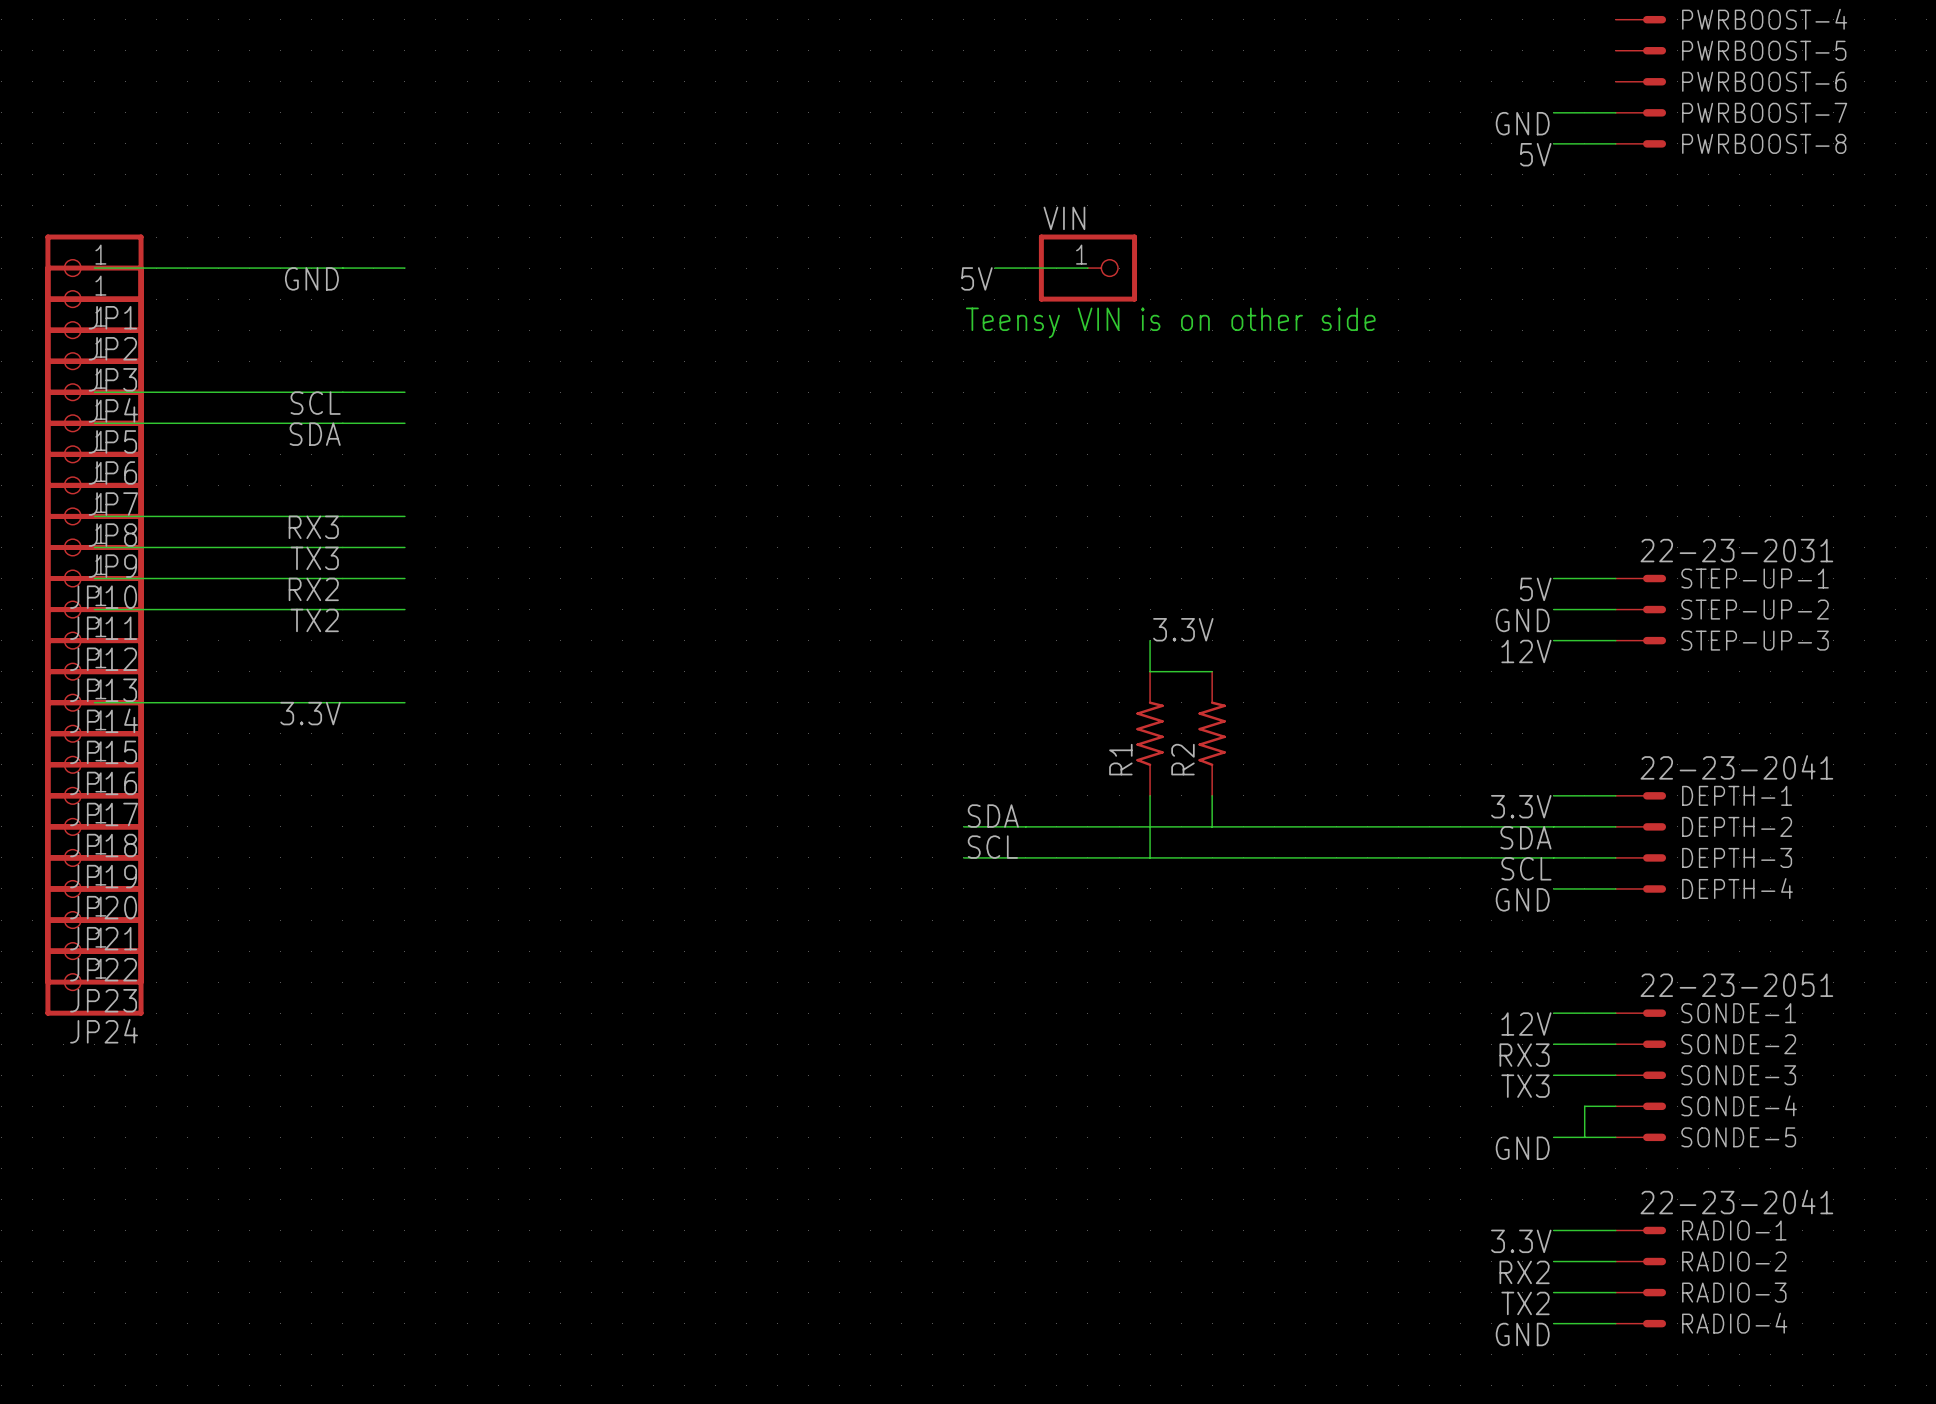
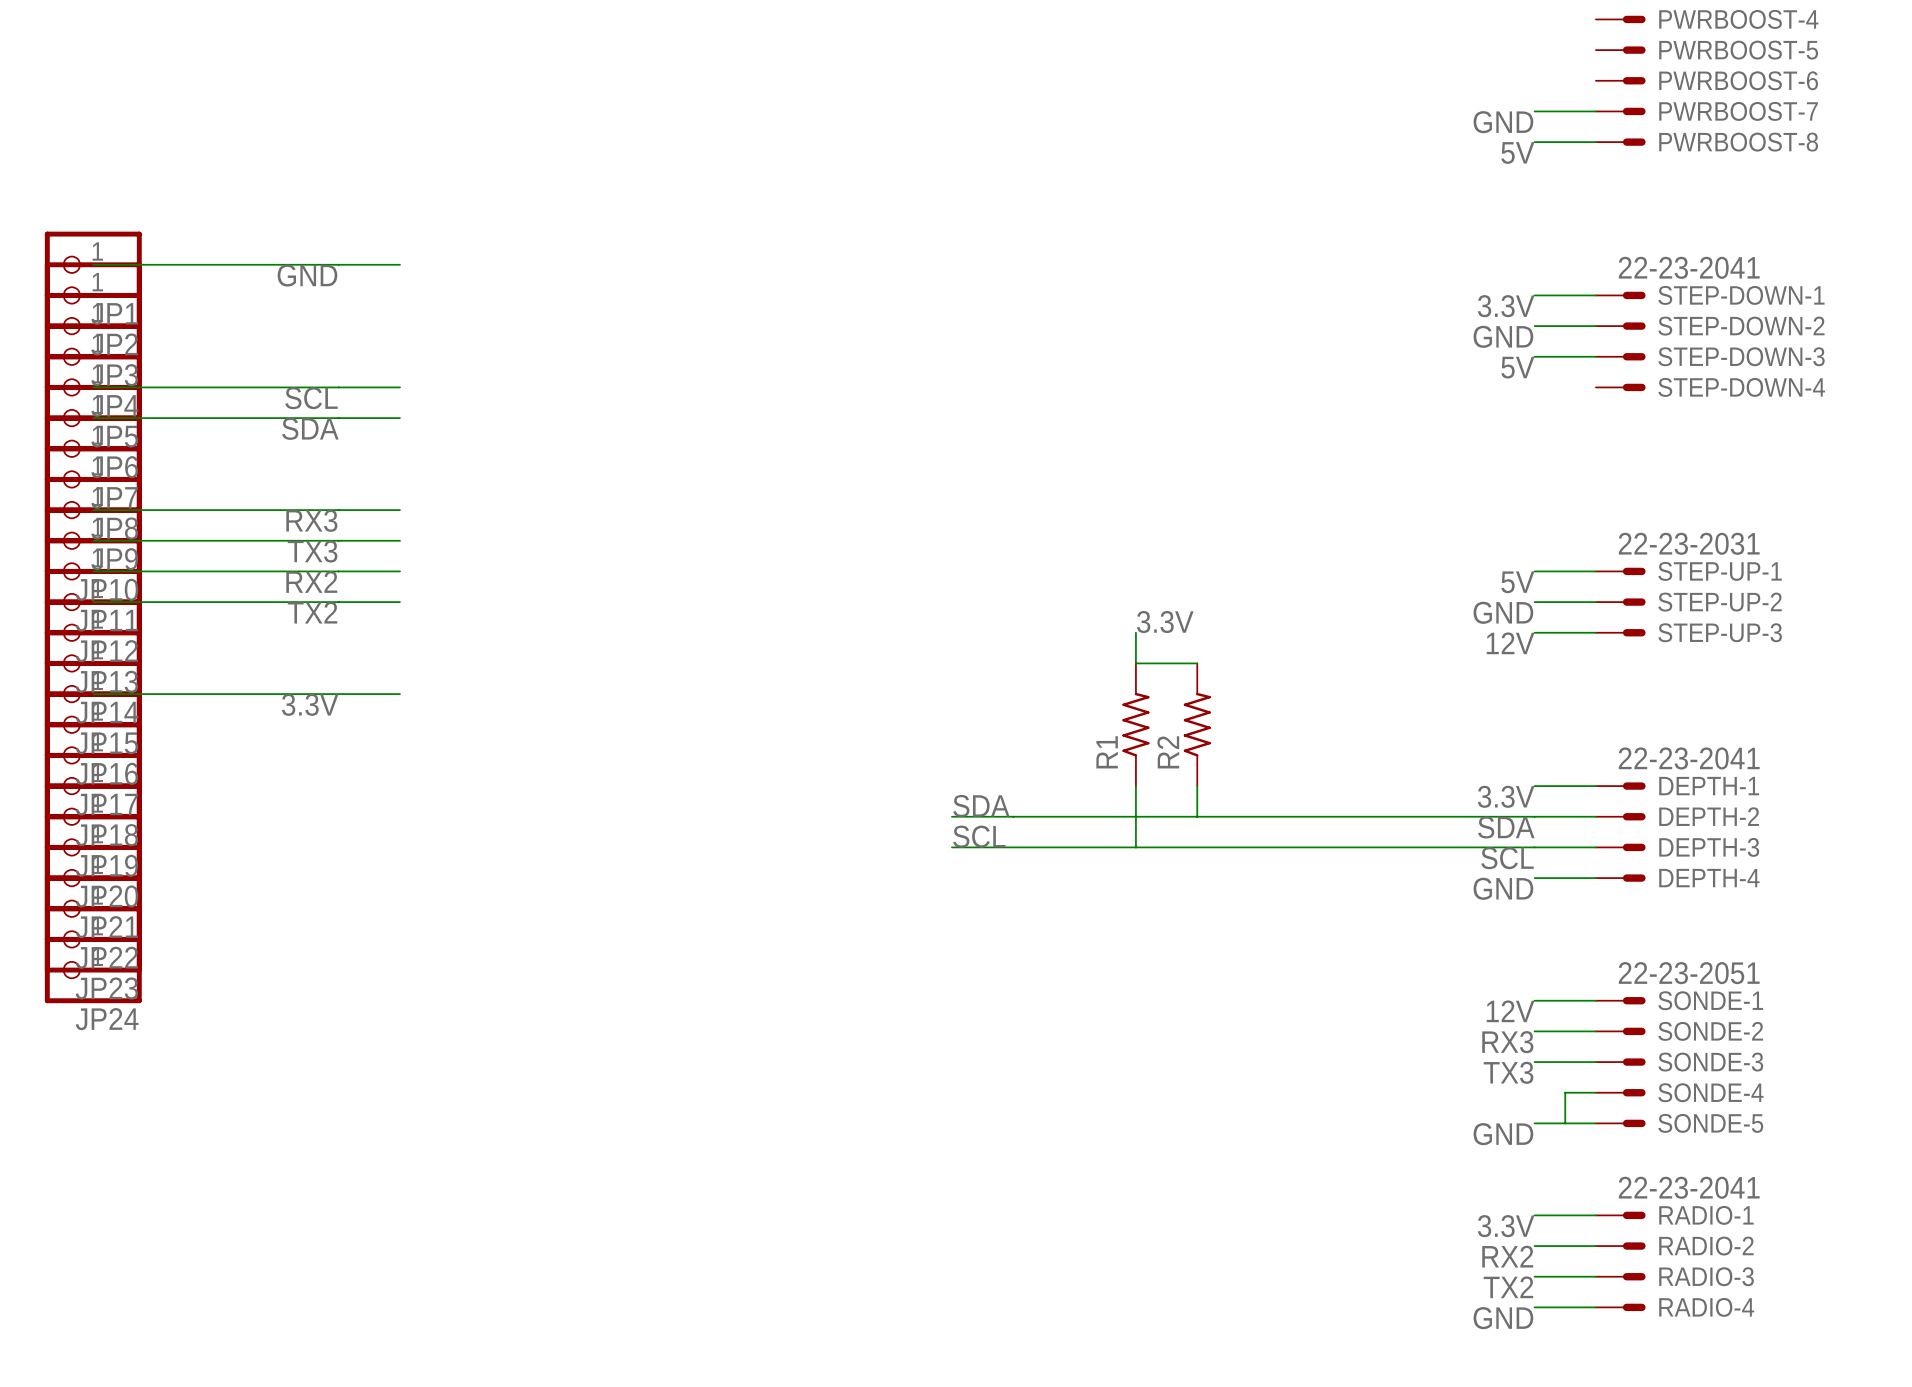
wire: (994, 268) (1087, 268) -> none
VIN: (1087, 268) -> none
label: 5V (976, 278) -> none
wire: none -> (1534, 295) (1595, 295)
STEP-DOWN-1: none -> 22-23-2041 (1620, 295)
label: none -> 3.3V (1506, 306)
text: Teensy VIN is on other side (1170, 322) -> none
wire: none -> (1534, 326) (1595, 326)
STEP-DOWN-2: none -> (1620, 326)
label: none -> GND (1503, 336)
wire: none -> (1534, 356) (1595, 356)
STEP-DOWN-3: none -> (1620, 356)
label: none -> 5V (1517, 367)
STEP-DOWN-4: none -> (1620, 387)

